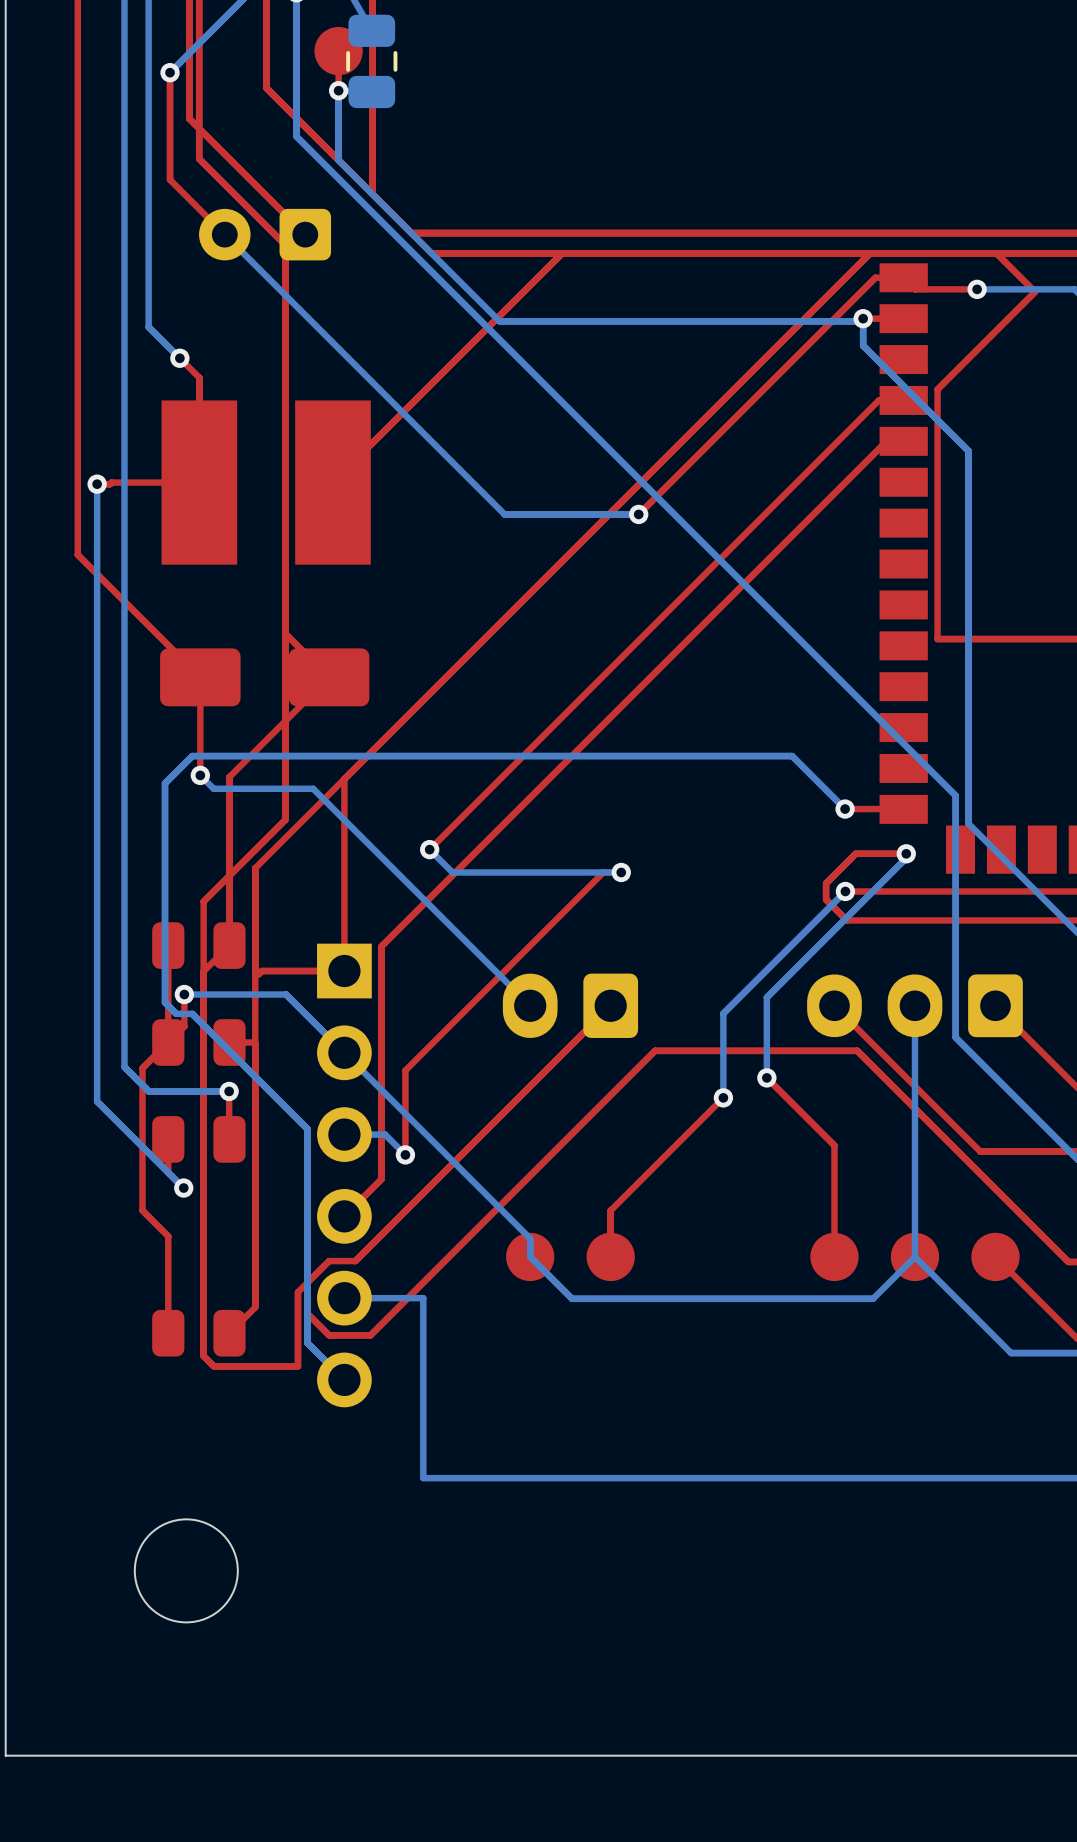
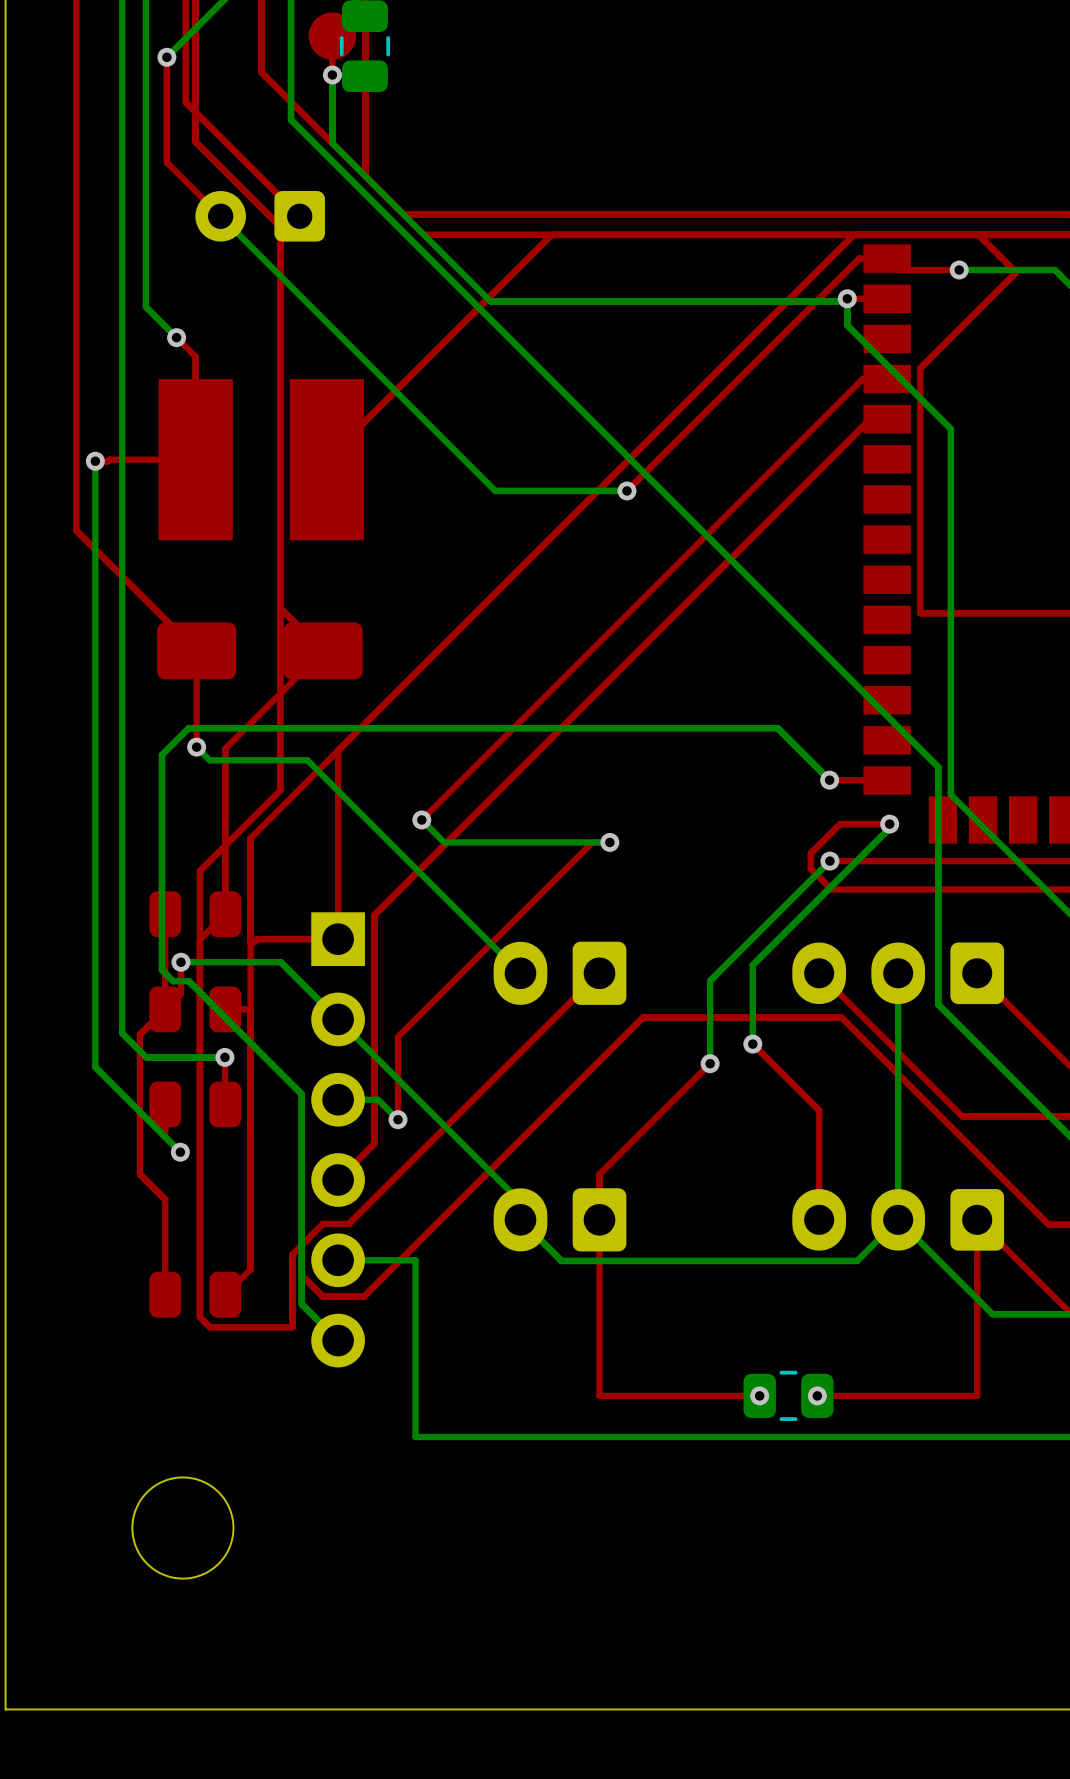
part footprint: [890, 1232, 940, 1282] -> [792, 1189, 1005, 1251]
part: (530, 1256) -> none
part: none -> (559, 1219)
top track: none -> (599, 1219) (599, 1395) (759, 1395)
part: (610, 1256) -> none
part: (834, 1256) -> none
top track: none -> (977, 1219) (977, 1395) (817, 1395)
part: (995, 1256) -> none
via: none -> (759, 1395)
part: none -> (788, 1395)
via: none -> (817, 1395)

